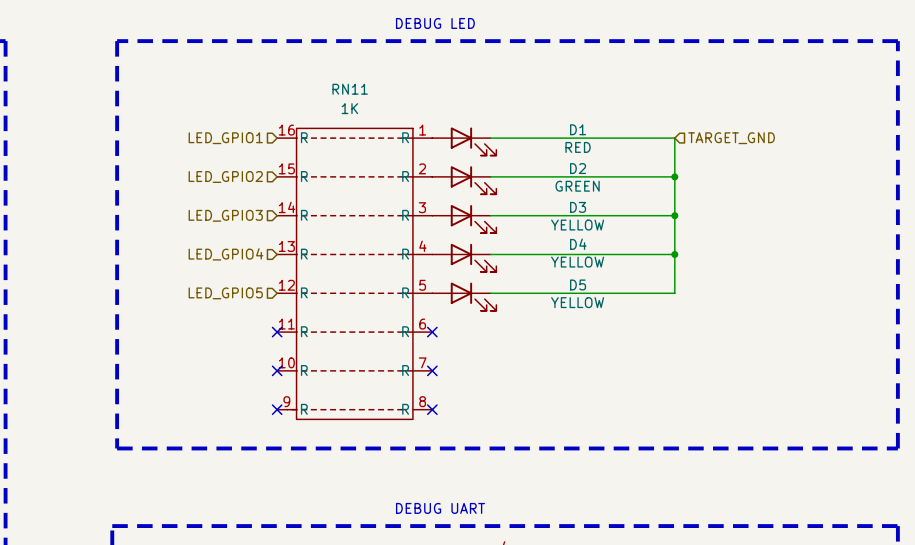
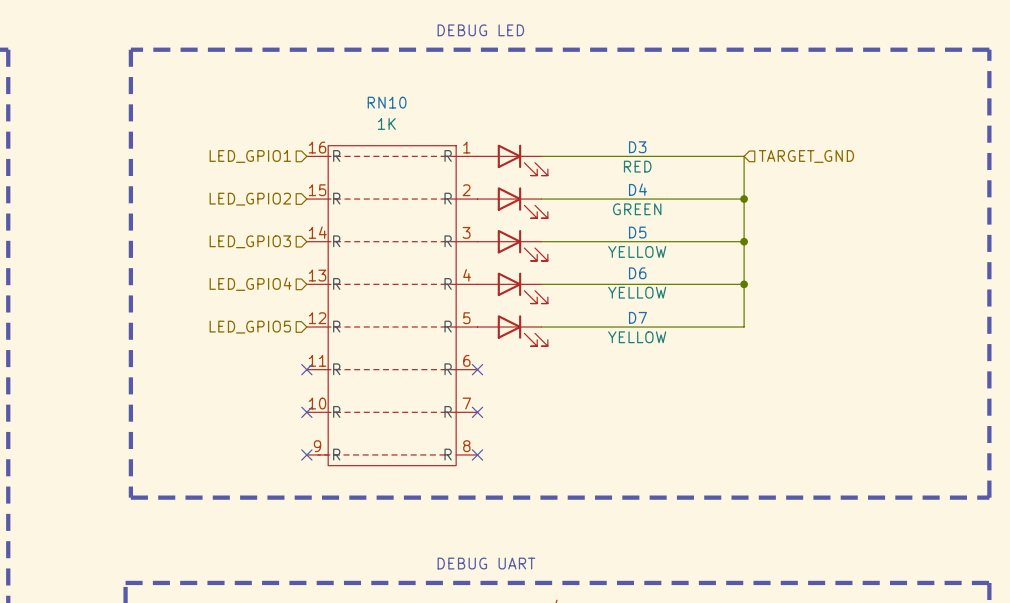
RN11 name: RN11 (350, 89) -> RN10 (387, 102)
D1 name: D1 (578, 129) -> D3 (637, 147)
D2 name: D2 (578, 168) -> D4 (637, 189)
D3 name: D3 (578, 207) -> D5 (637, 232)
D4 name: D4 (578, 244) -> D6 (637, 273)
D5 name: D5 (578, 284) -> D7 (637, 317)

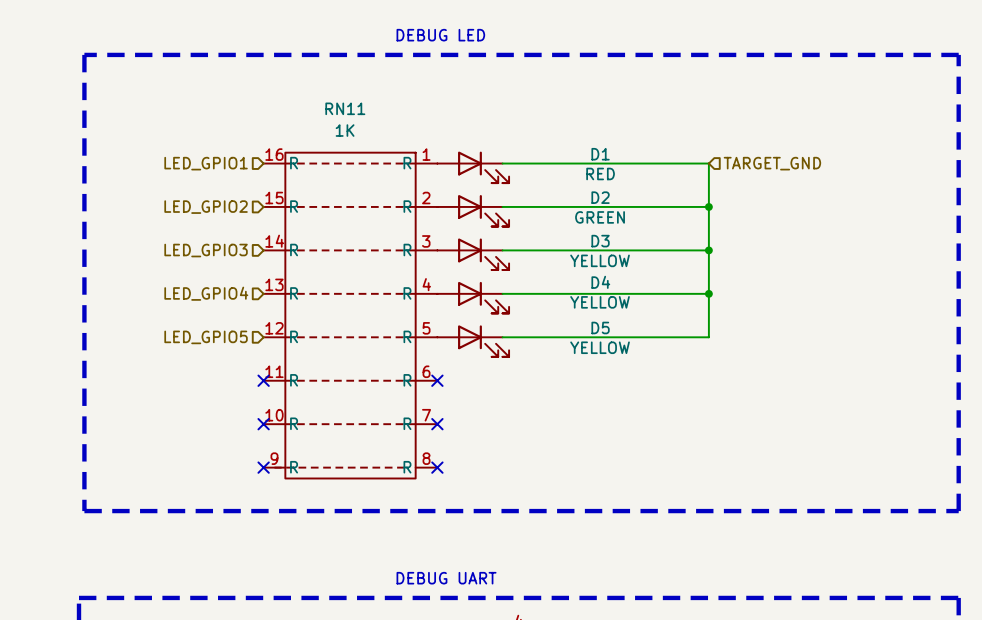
RN10 name: RN10 (387, 102) -> RN11 (345, 108)
D3 name: D3 (637, 147) -> D1 (600, 154)
D4 name: D4 (637, 189) -> D2 (600, 197)
D5 name: D5 (637, 232) -> D3 (600, 241)
D6 name: D6 (637, 273) -> D4 (600, 282)
D7 name: D7 (637, 317) -> D5 (600, 327)

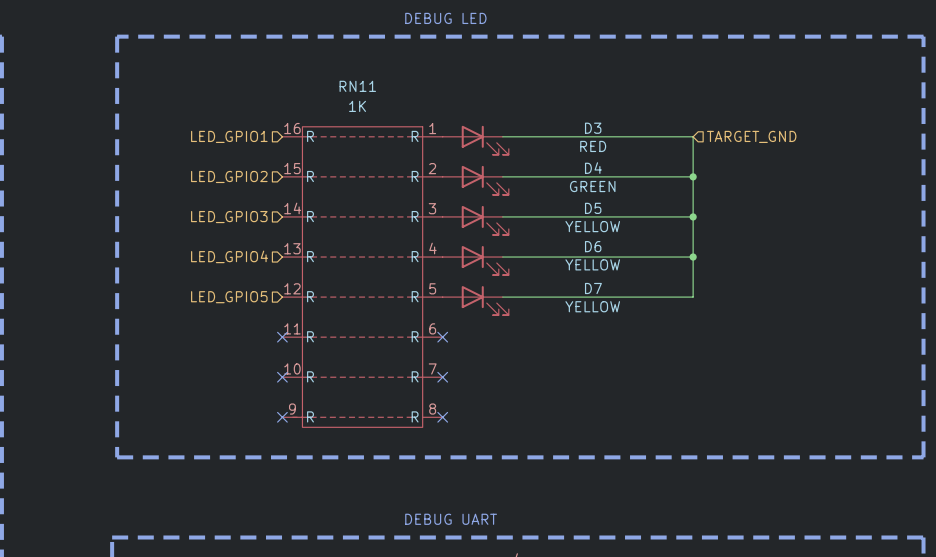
D1 name: D1 (600, 154) -> D3 (593, 128)
D2 name: D2 (600, 197) -> D4 (593, 168)
D3 name: D3 (600, 241) -> D5 (593, 208)
D4 name: D4 (600, 282) -> D6 (593, 246)
D5 name: D5 (600, 327) -> D7 (593, 288)

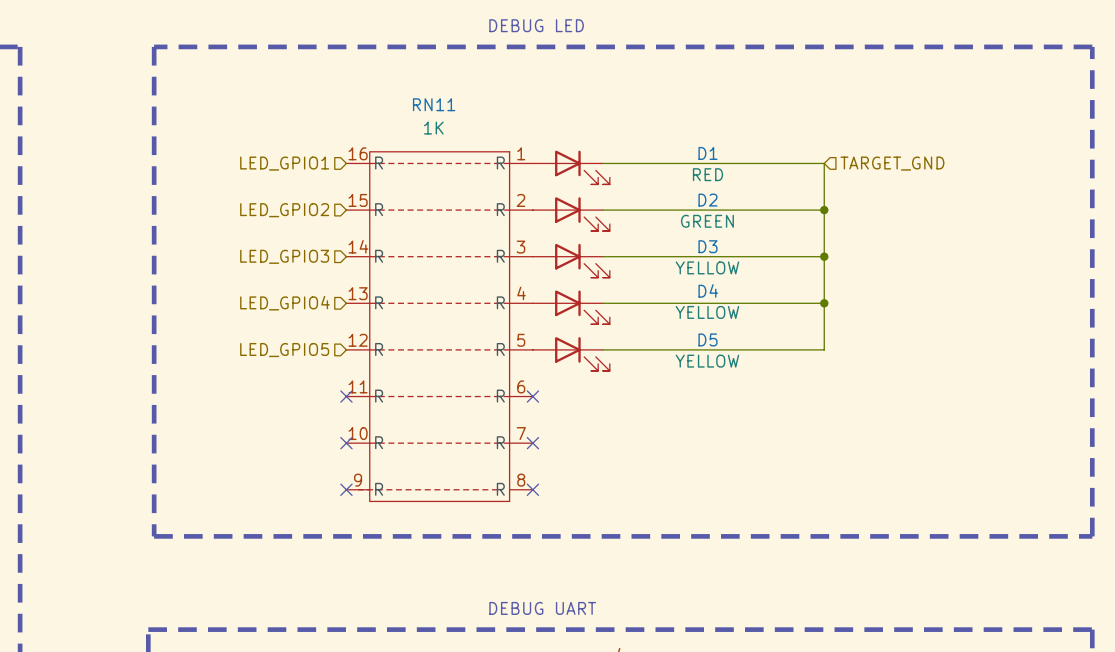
D3 name: D3 (593, 128) -> D1 (707, 153)
D4 name: D4 (593, 168) -> D2 (707, 200)
D5 name: D5 (593, 208) -> D3 (707, 246)
D6 name: D6 (593, 246) -> D4 (708, 290)
D7 name: D7 (593, 288) -> D5 (707, 339)

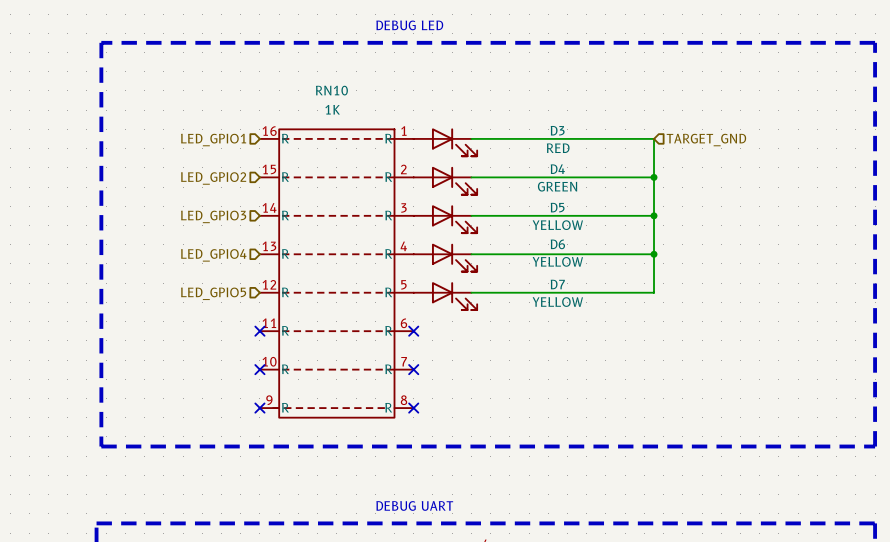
RN11 name: RN11 (434, 104) -> RN10 (331, 90)
D1 name: D1 (707, 153) -> D3 (557, 130)
D2 name: D2 (707, 200) -> D4 (557, 169)
D3 name: D3 (707, 246) -> D5 (557, 207)
D4 name: D4 (708, 290) -> D6 (557, 244)
D5 name: D5 (707, 339) -> D7 (557, 284)

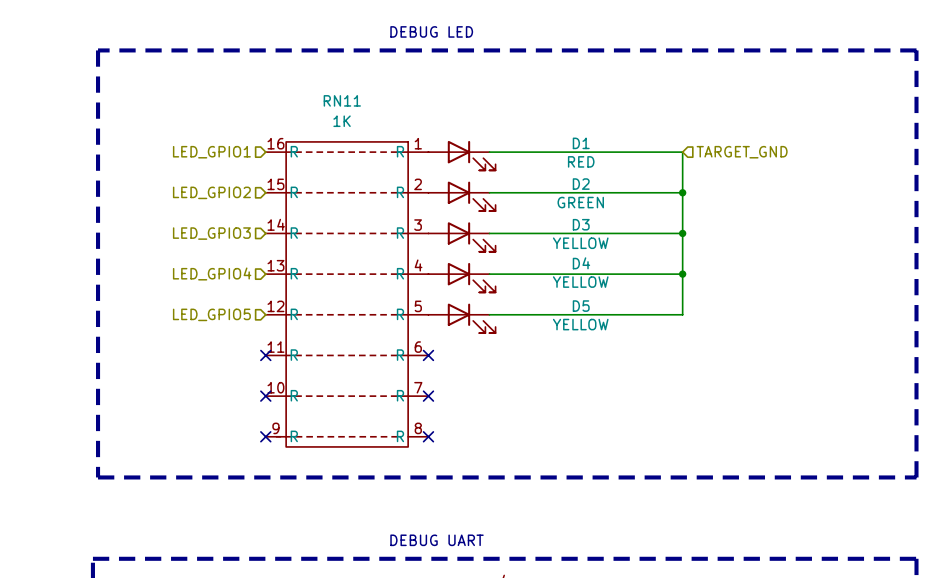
RN10 name: RN10 (331, 90) -> RN11 (342, 100)
D3 name: D3 (557, 130) -> D1 (581, 143)
D4 name: D4 (557, 169) -> D2 (581, 184)
D5 name: D5 (557, 207) -> D3 (581, 224)
D6 name: D6 (557, 244) -> D4 (581, 263)
D7 name: D7 (557, 284) -> D5 (581, 306)

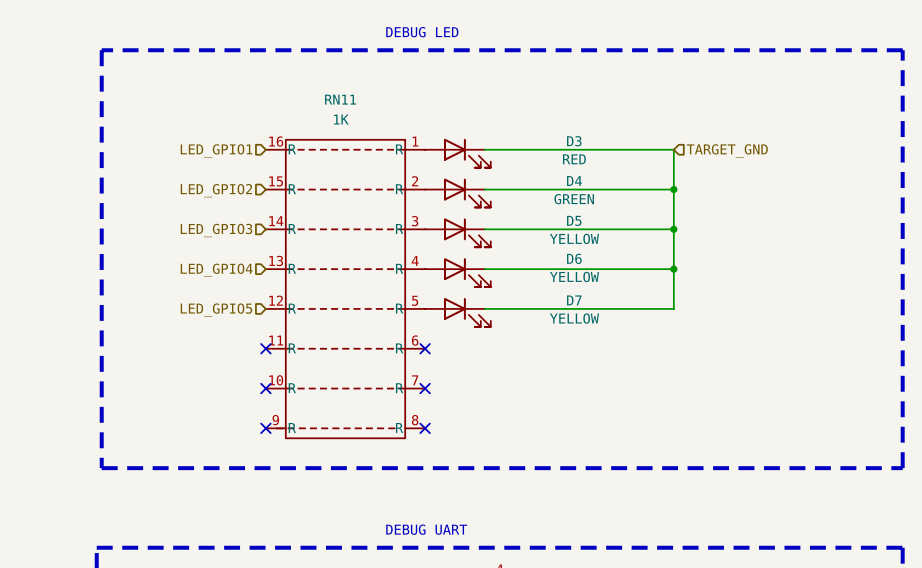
D1 name: D1 (581, 143) -> D3 (574, 141)
D2 name: D2 (581, 184) -> D4 (574, 181)
D3 name: D3 (581, 224) -> D5 (574, 220)
D4 name: D4 (581, 263) -> D6 (574, 258)
D5 name: D5 (581, 306) -> D7 (574, 300)

